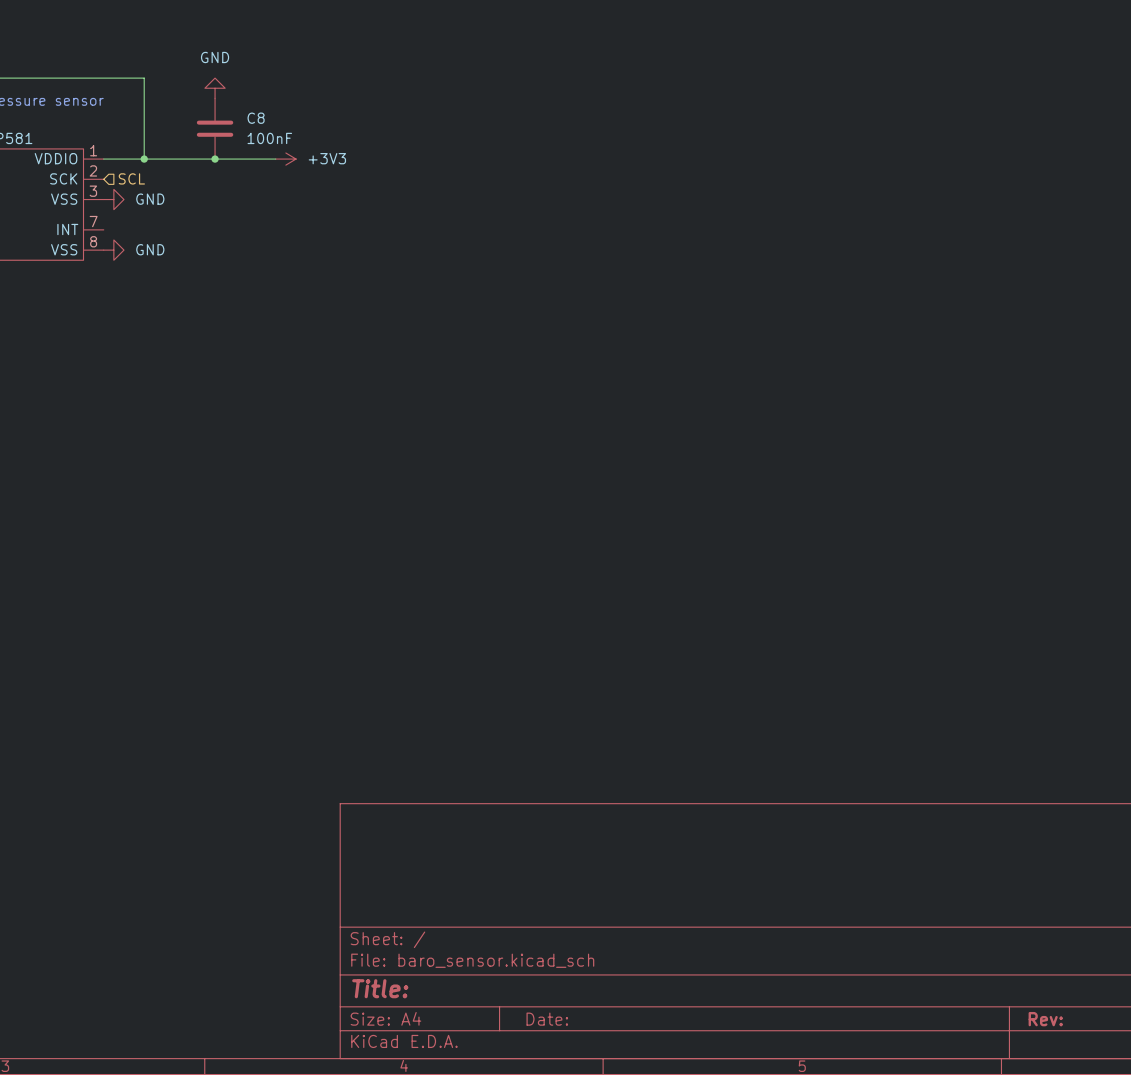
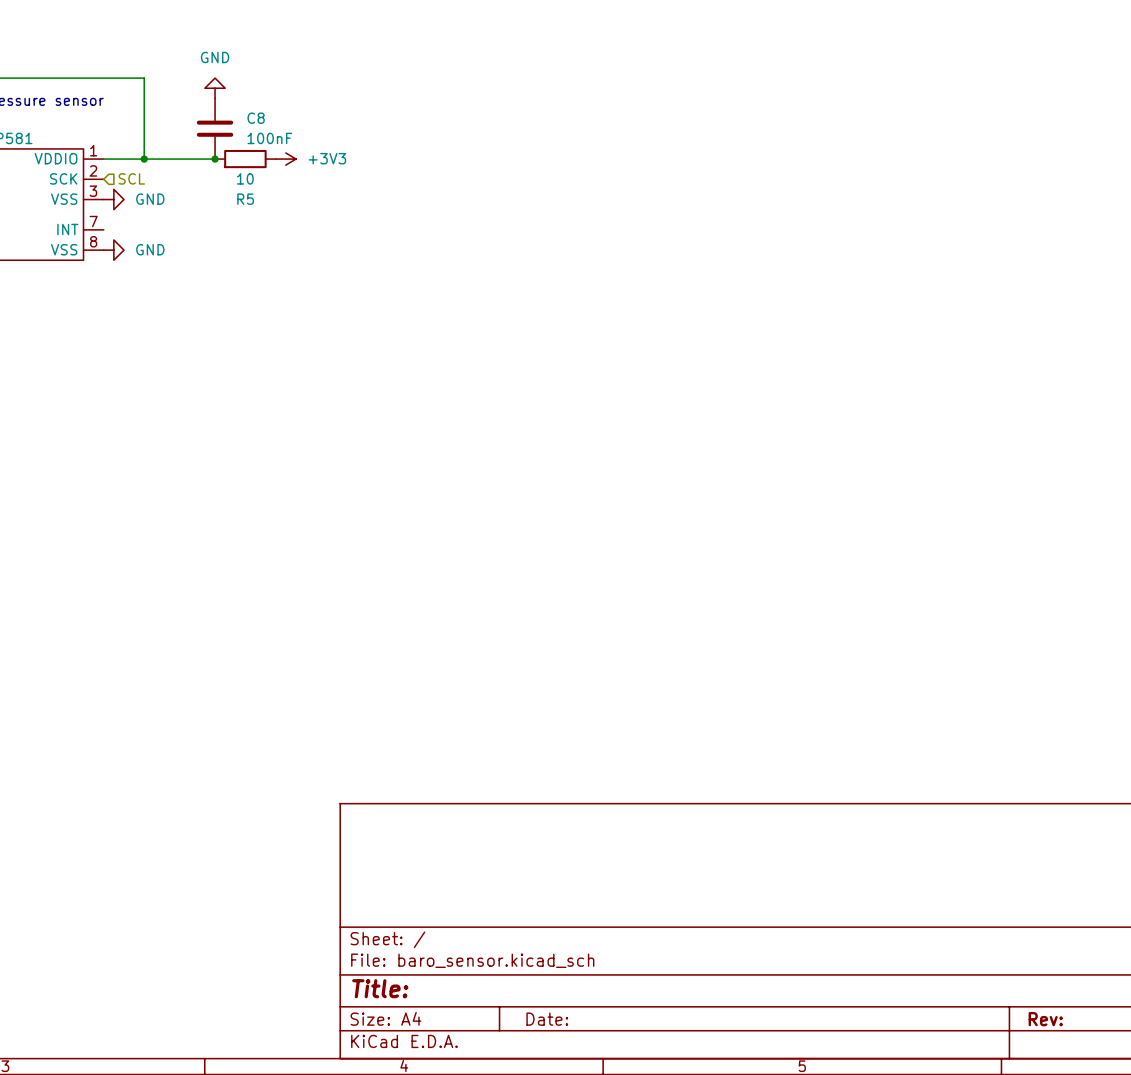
wire: (215, 159) (275, 159) -> none
R5: none -> 10 (245, 159)

